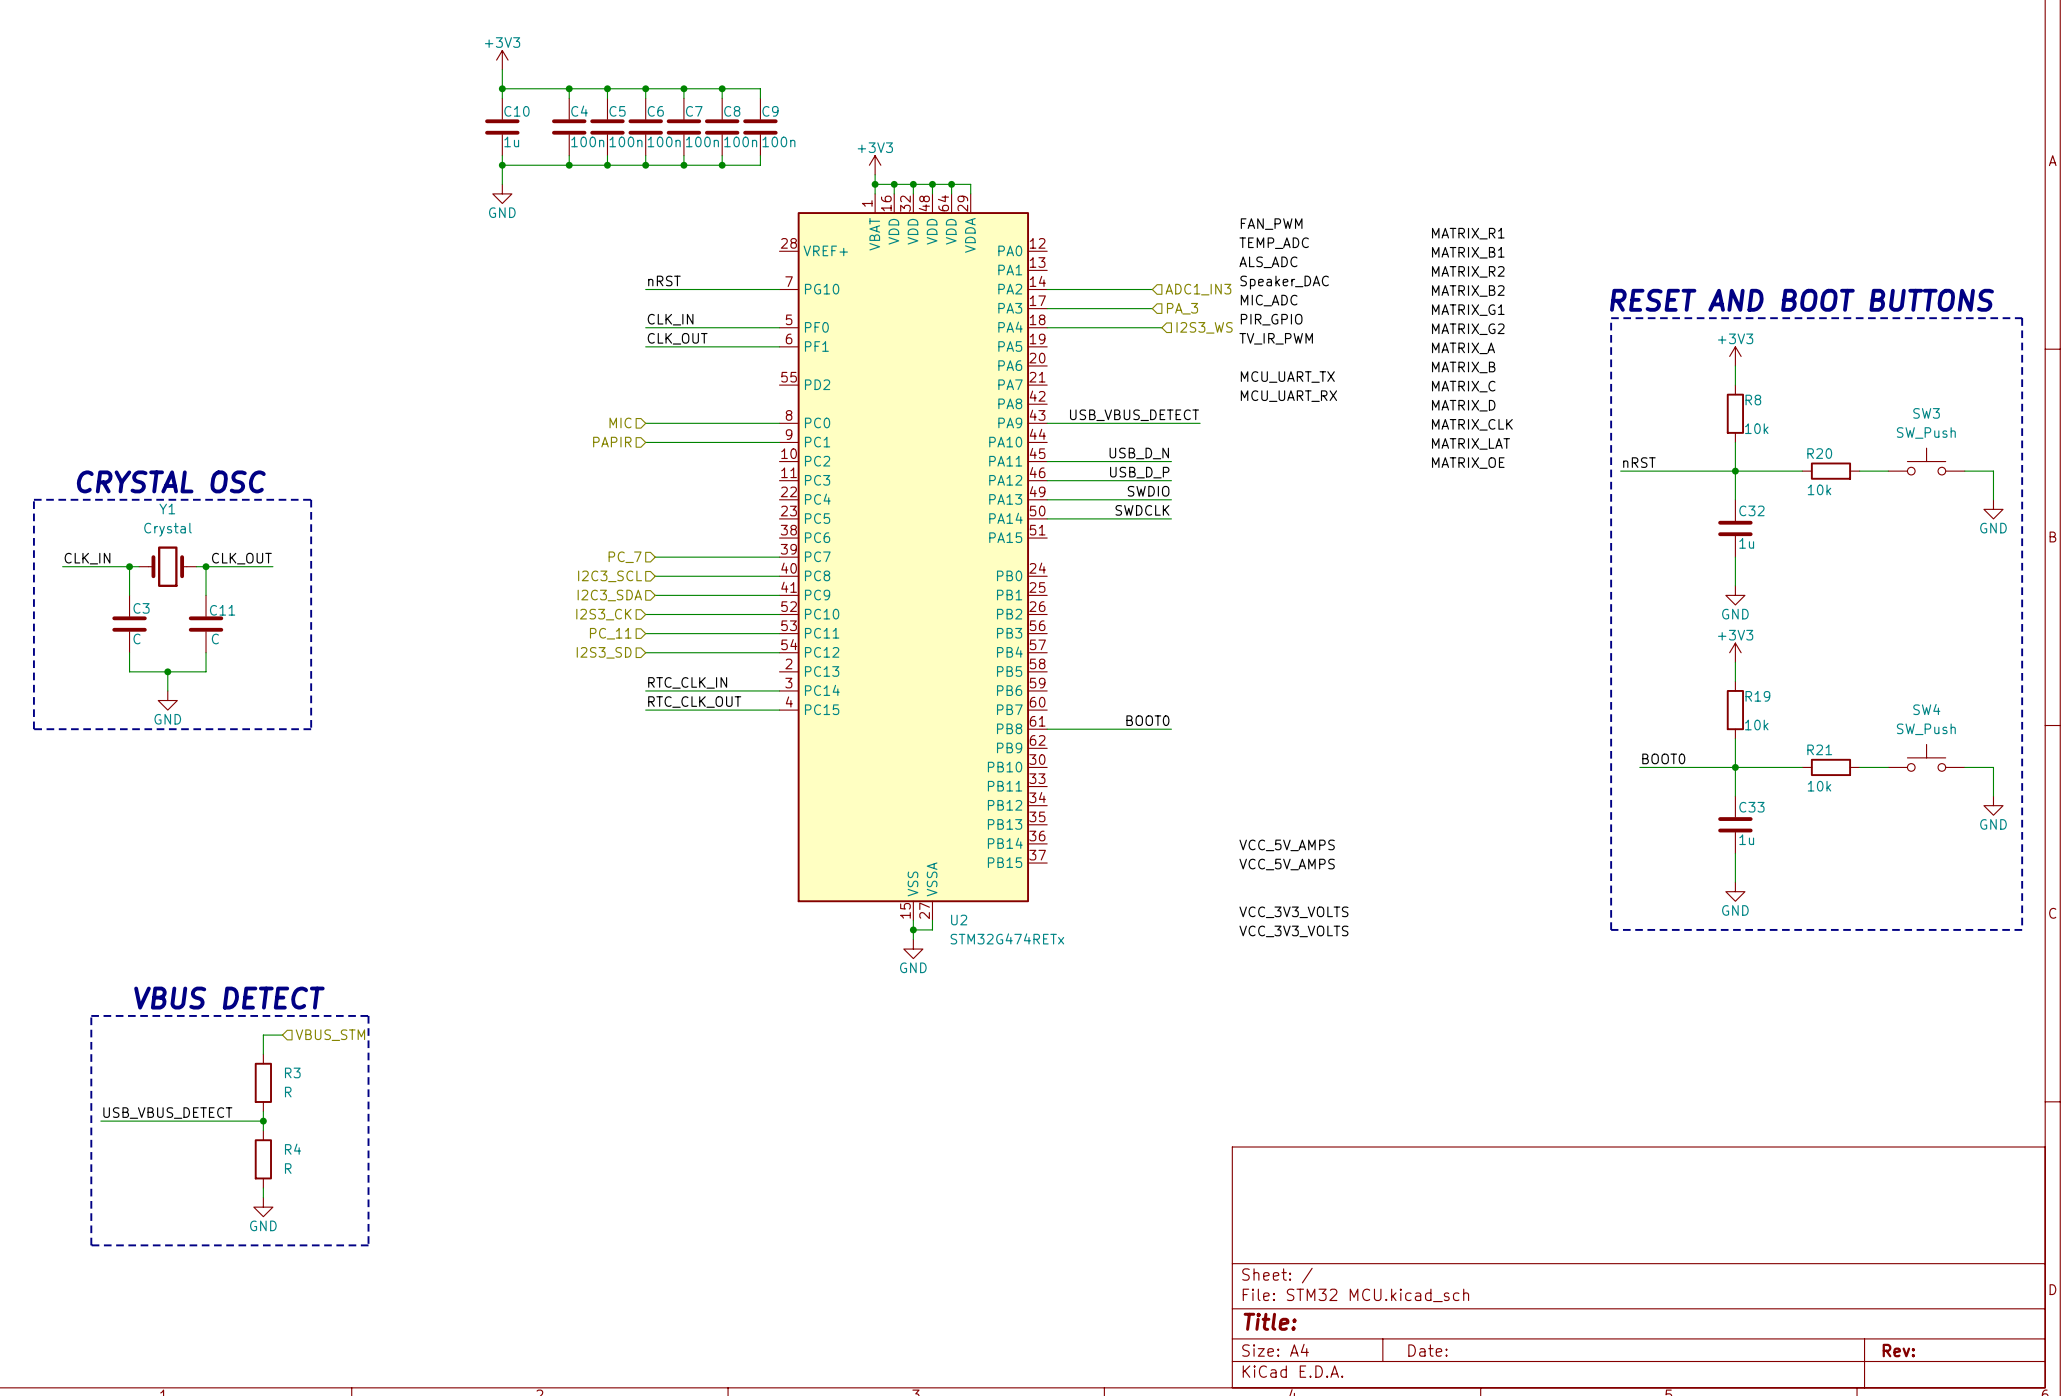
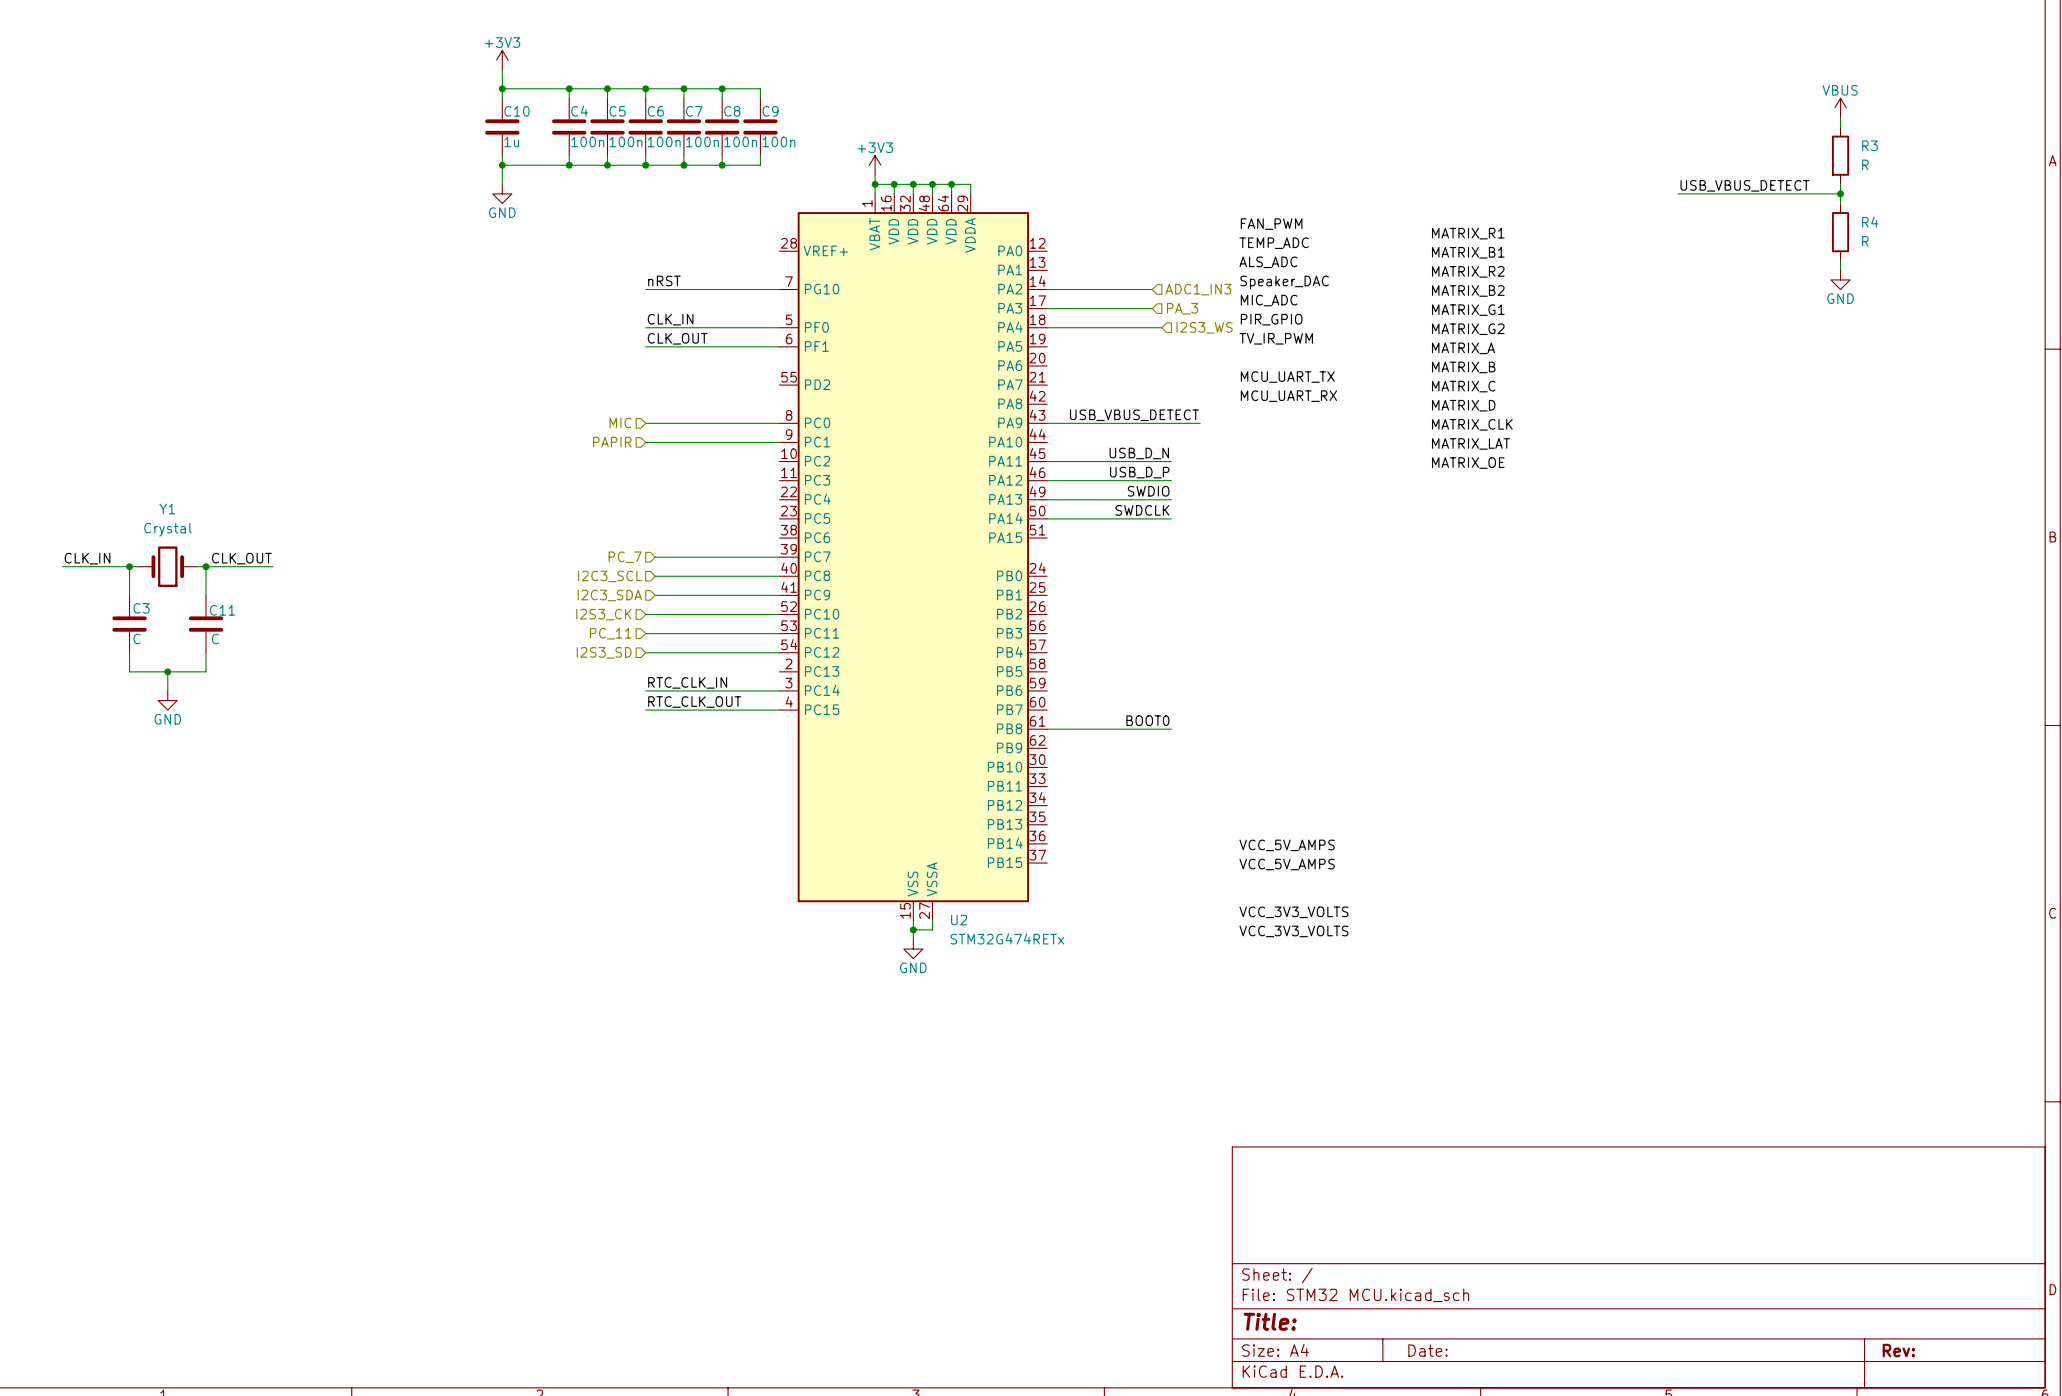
power symbol: none -> VBUS (1840, 107)
wire: none -> (1840, 117) (1840, 127)
wire: none -> (1840, 184) (1840, 203)
label: none -> USB_VBUS_DETECT (1745, 185)
wire: none -> (1678, 193) (1840, 193)
junction: none -> (1840, 193)
wire: none -> (1840, 260) (1840, 270)
power symbol: none -> GND (1840, 279)
text: RESET AND BOOT BUTTONS (1801, 300) -> none
line: (1611, 318) (2022, 318) (2022, 929) (1611, 929) (1611, 318) -> none
power symbol: +3V3 (1735, 356) -> none
wire: (1735, 365) (1735, 385) -> none
R8: 10k (1735, 413) -> none
wire: (1735, 442) (1735, 499) -> none
SW3: SW_Push (1926, 461) -> none
label: nRST (1639, 462) -> none
wire: (1620, 471) (1802, 471) -> none
junction: (1735, 471) -> none
R20: 10k (1830, 471) -> none
wire: (1859, 471) (1888, 471) -> none
wire: (1964, 471) (1993, 471) (1993, 499) -> none
text: CRYSTAL OSC (171, 481) -> none
line: (33, 499) (311, 499) (311, 729) (33, 729) (33, 499) -> none
power symbol: GND (1993, 509) -> none
C32: 1u (1735, 528) -> none
wire: (1735, 557) (1735, 585) -> none
power symbol: GND (1735, 595) -> none
power symbol: +3V3 (1735, 652) -> none
wire: (1735, 662) (1735, 681) -> none
R19: 10k (1735, 710) -> none
wire: (1735, 738) (1735, 796) -> none
SW4: SW_Push (1926, 757) -> none
label: BOOT0 (1663, 758) -> none
wire: (1639, 767) (1802, 767) -> none
junction: (1735, 767) -> none
R21: 10k (1830, 767) -> none
wire: (1859, 767) (1888, 767) -> none
wire: (1964, 767) (1993, 767) (1993, 796) -> none
power symbol: GND (1993, 805) -> none
C33: 1u (1735, 824) -> none
wire: (1735, 853) (1735, 882) -> none
power symbol: GND (1735, 891) -> none
text: VBUS DETECT (229, 998) -> none
line: (91, 1015) (368, 1015) (368, 1245) (91, 1245) (91, 1015) -> none
wire: (282, 1035) (263, 1035) (263, 1054) -> none
hierarchical label: VBUS_STM (330, 1035) -> none
R3 position: (263, 1082) -> (1840, 155)
wire: (263, 1111) (263, 1130) -> none
label: USB_VBUS_DETECT (167, 1113) -> none
wire: (100, 1121) (263, 1121) -> none
junction: (263, 1121) -> none
R4 position: (263, 1159) -> (1840, 232)
wire: (263, 1188) (263, 1197) -> none
power symbol: GND (263, 1207) -> none

